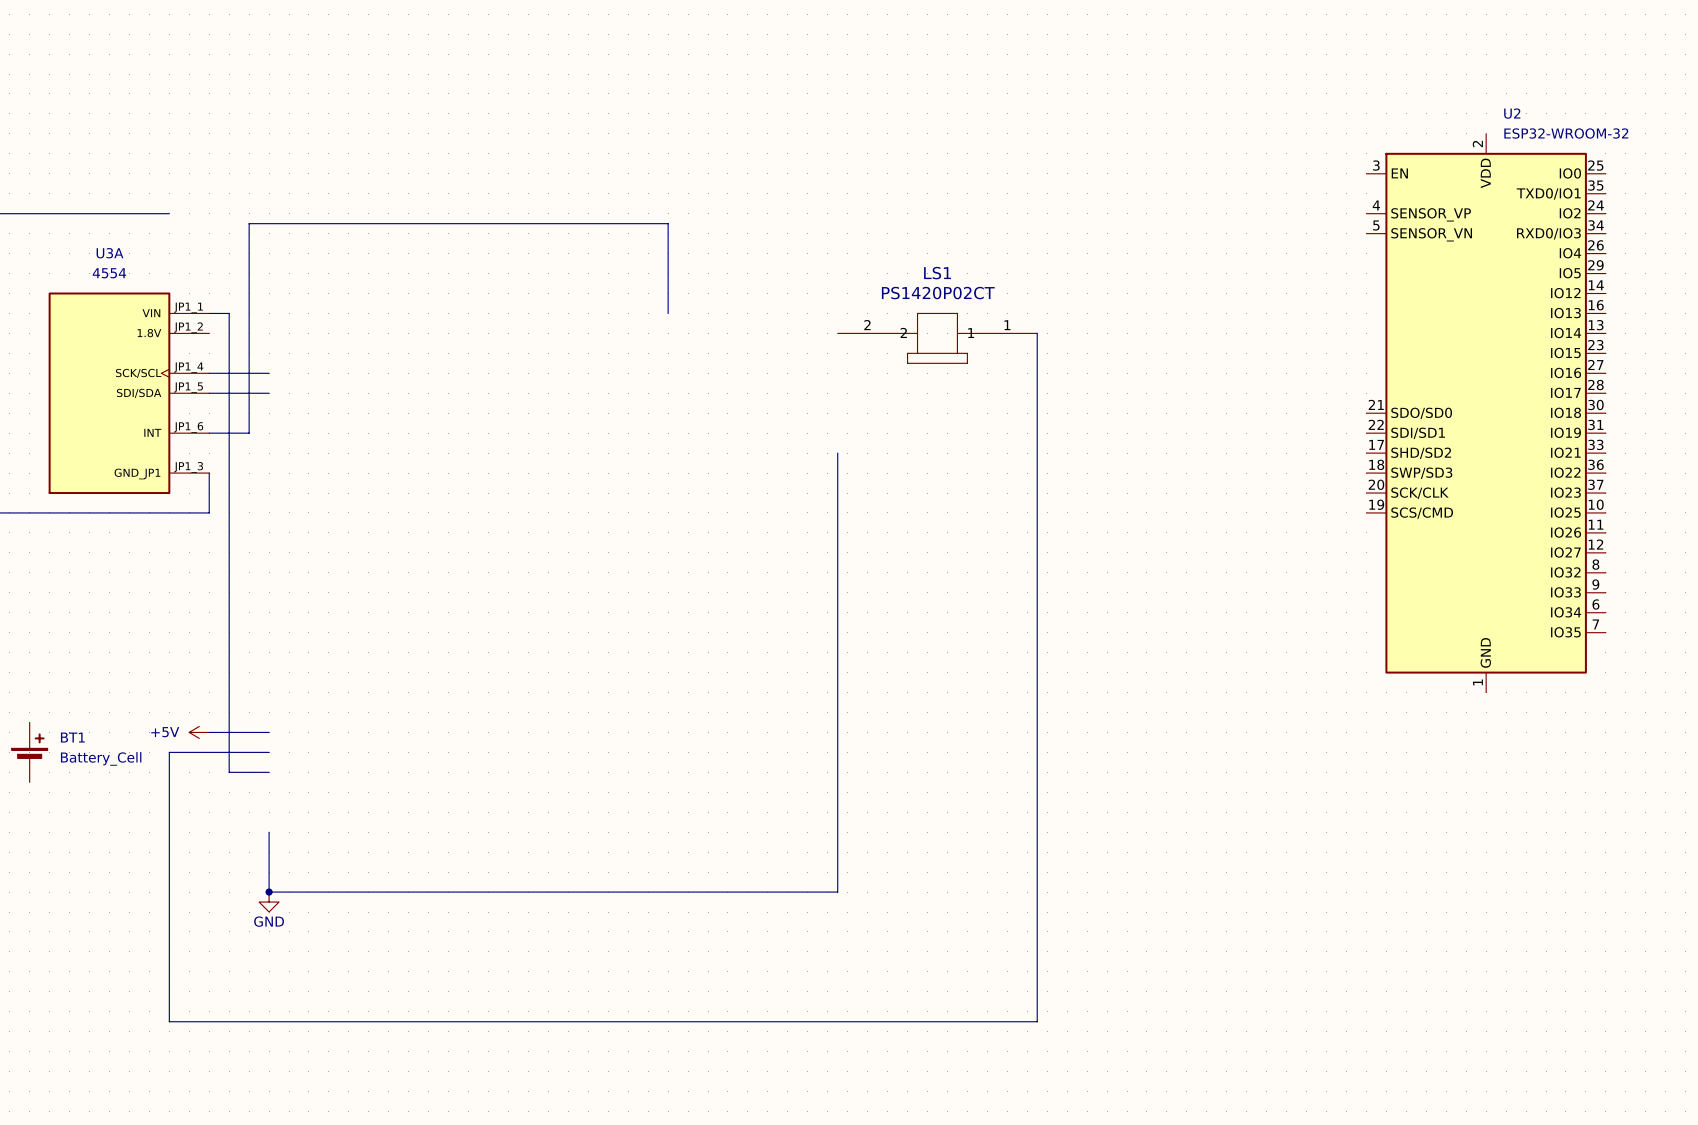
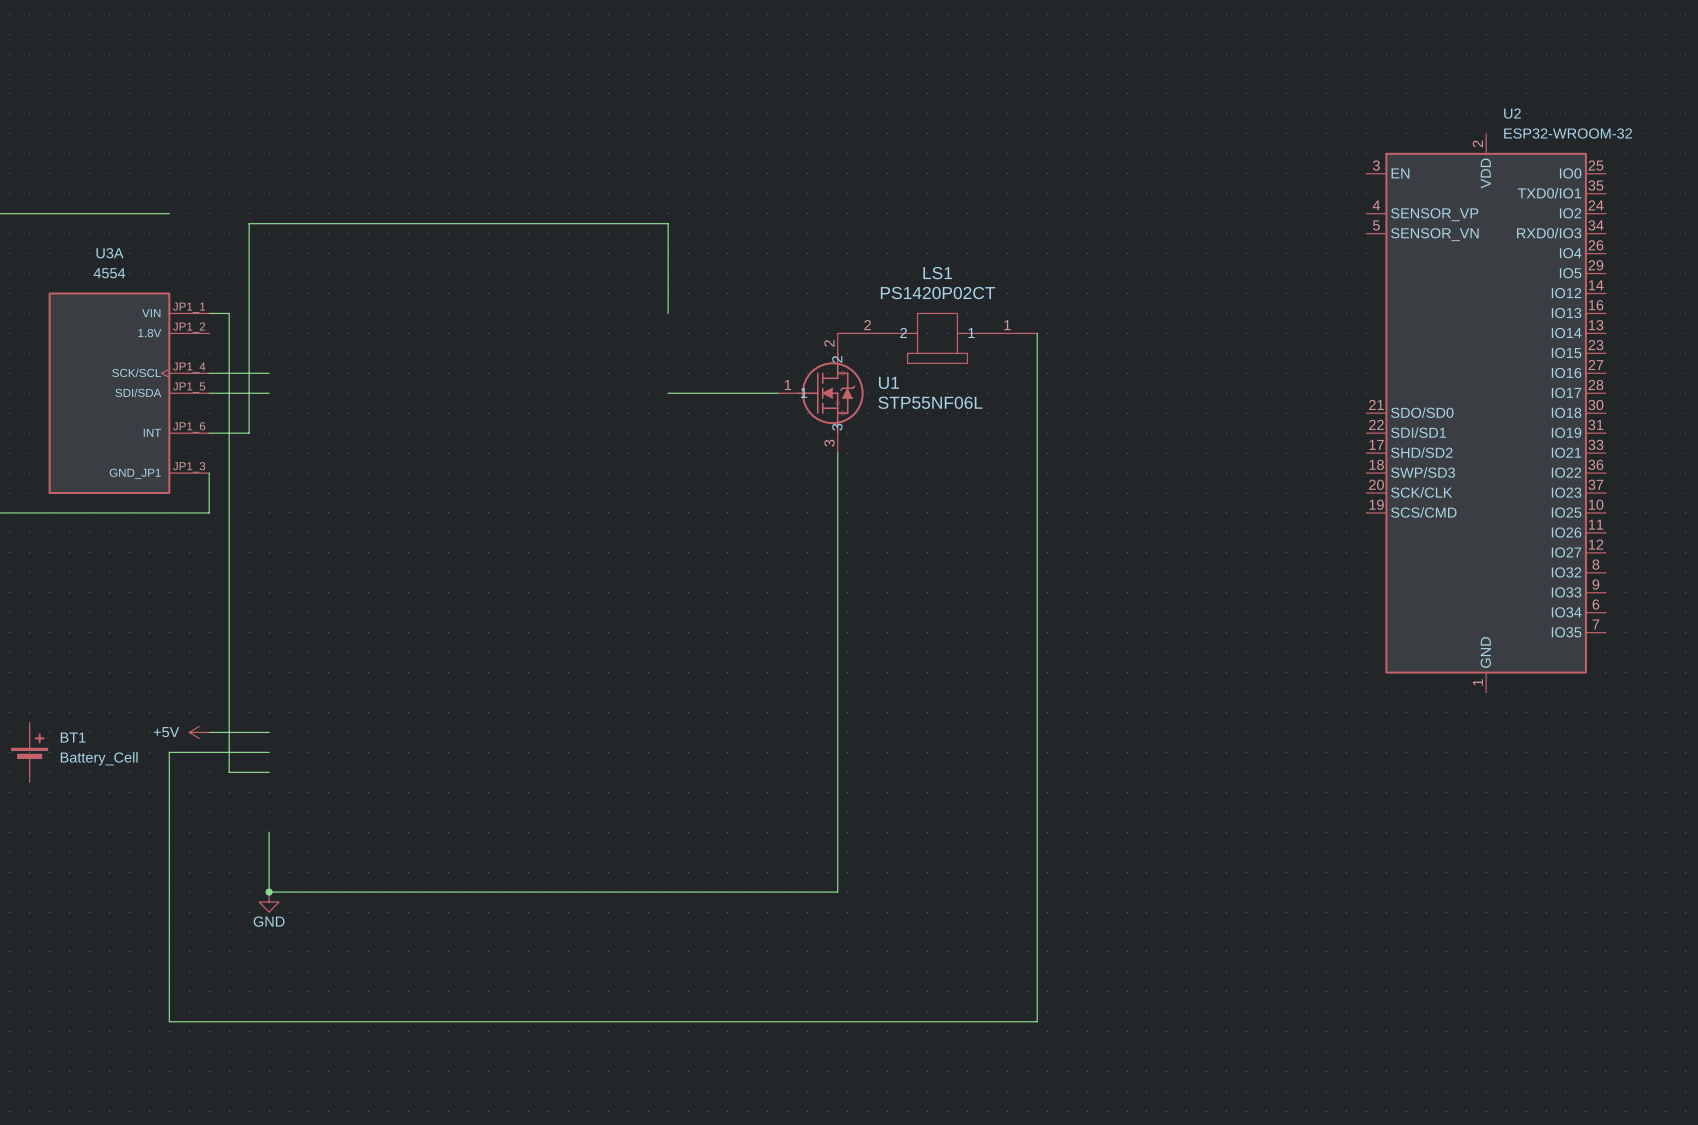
wire: none -> (668, 393) (777, 393)
U1: none -> STP55NF06L (820, 393)

